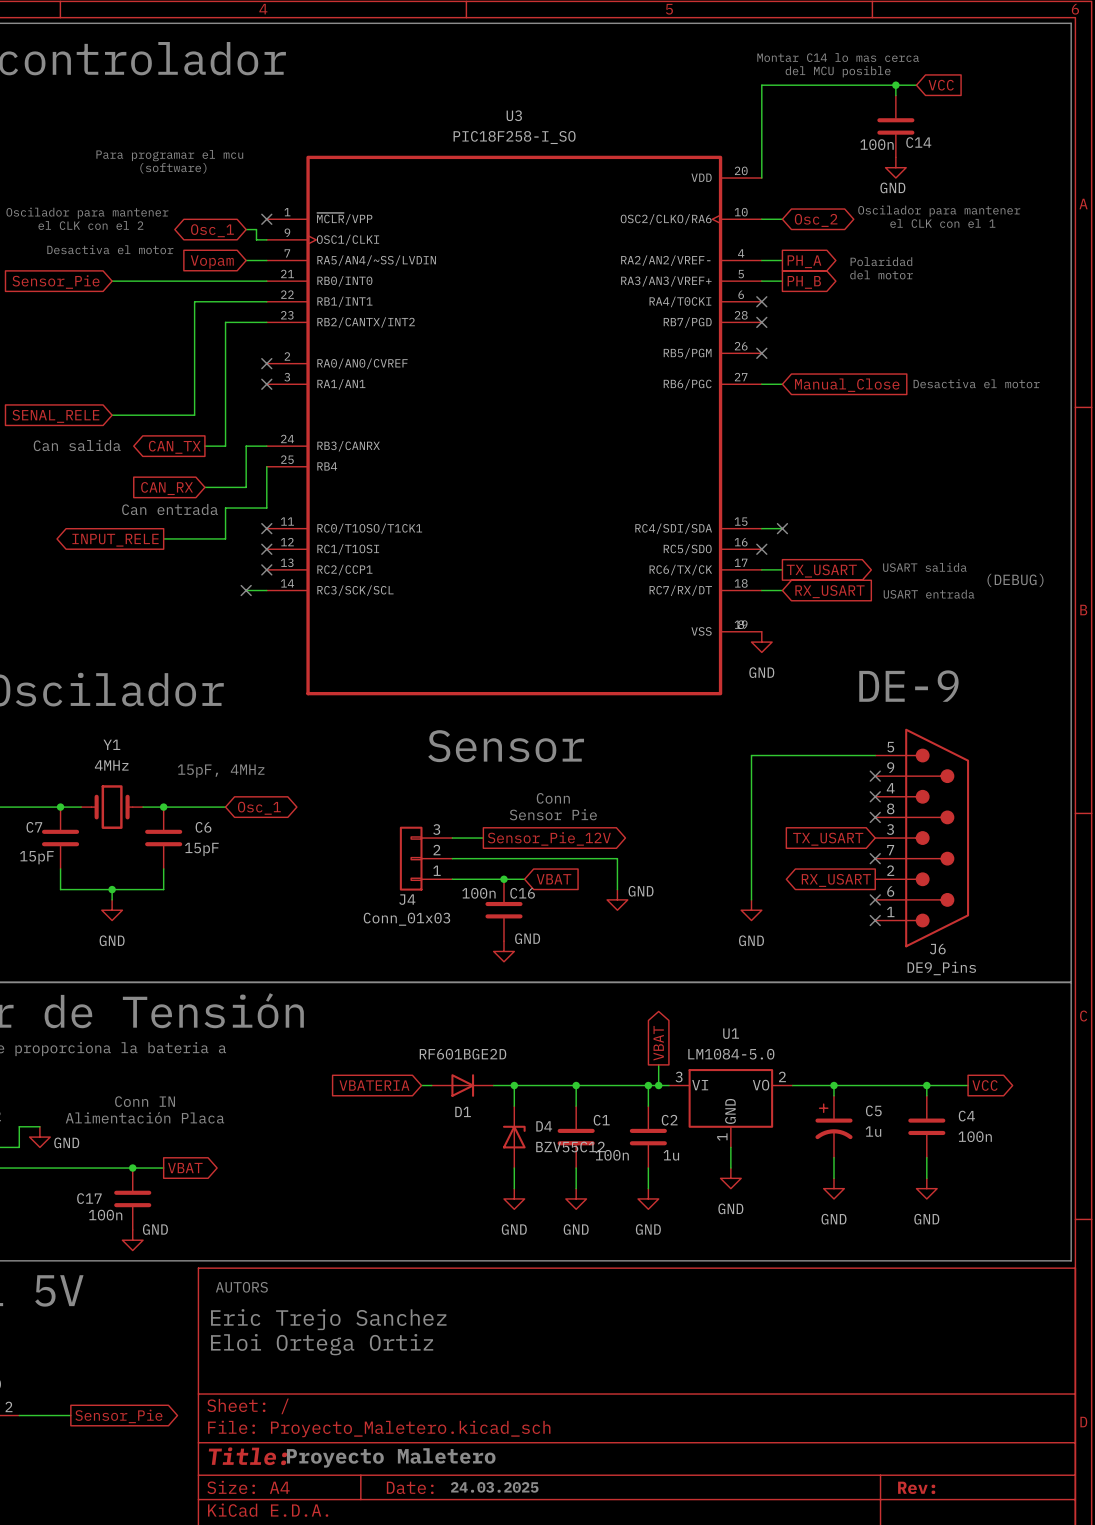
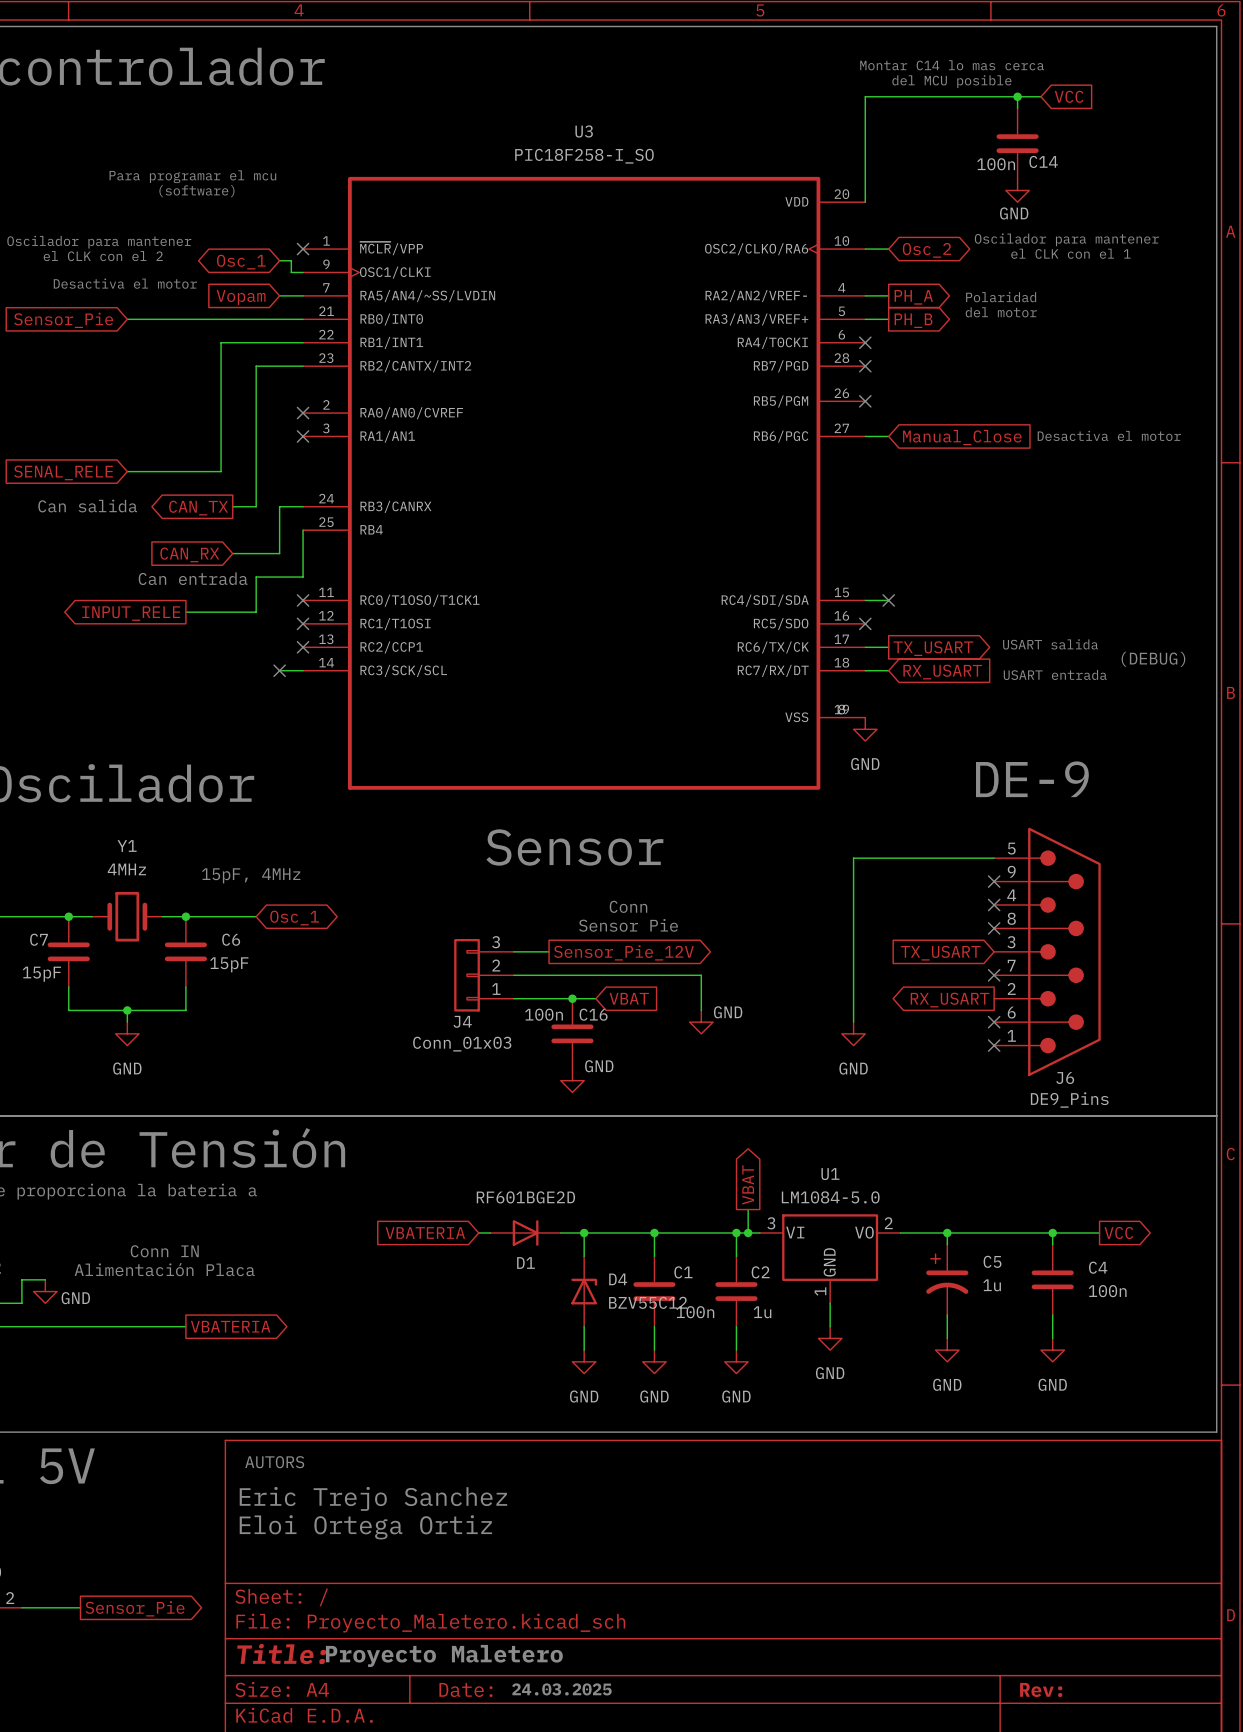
junction: (132, 1168) -> none
global label: VBAT (185, 1168) -> VBATERIA (230, 1326)
C17: 100n (132, 1198) -> none
power symbol: GND (132, 1240) -> none

